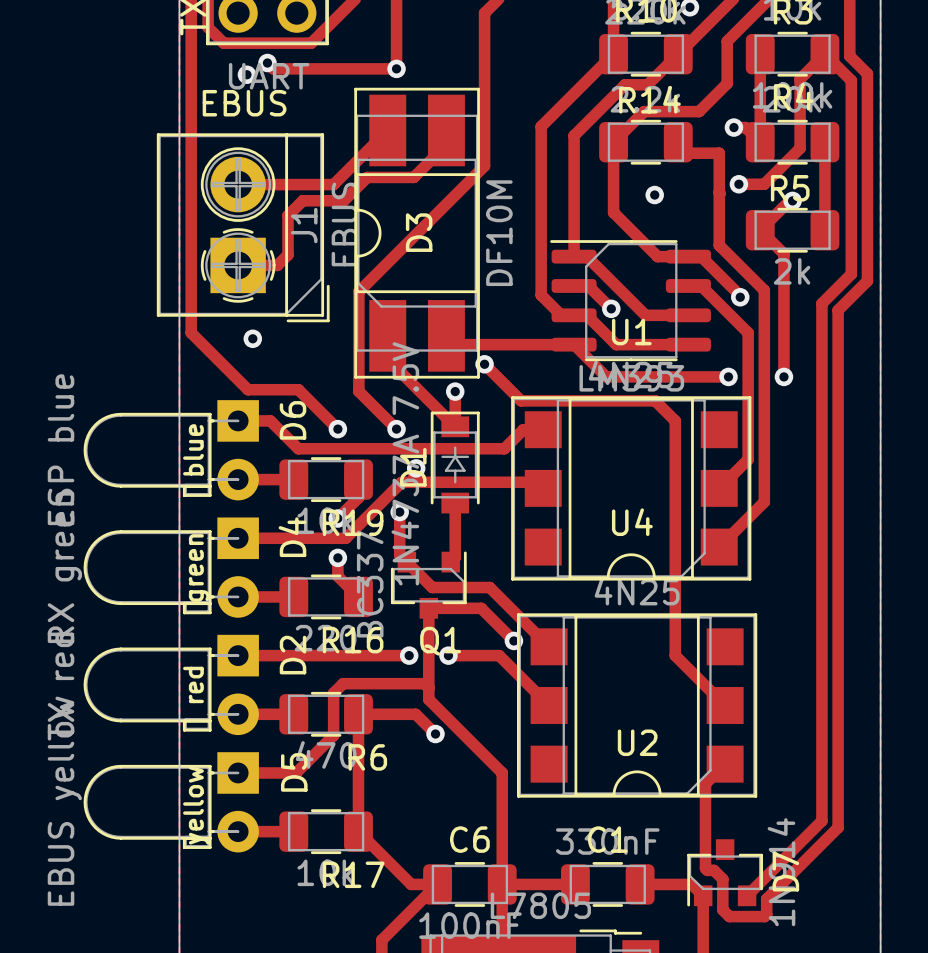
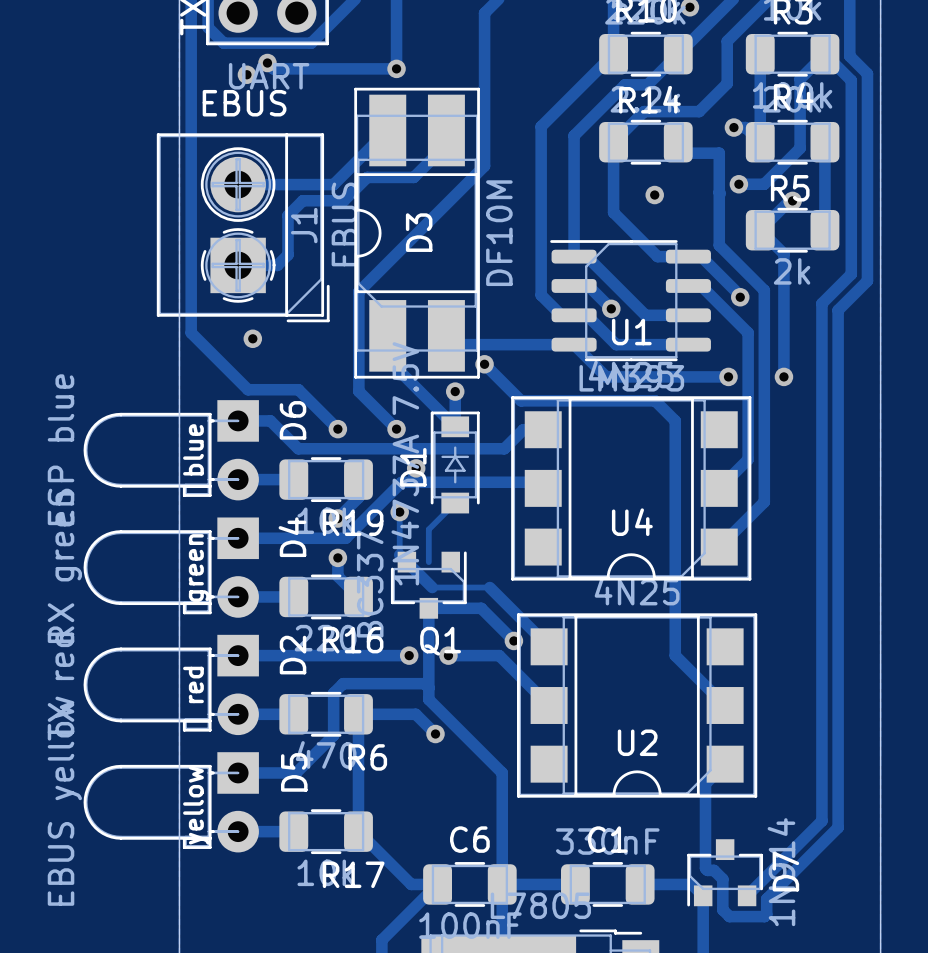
track: (455, 503) (455, 557) (450, 562) -> (455, 503) (428, 529) (428, 562)
track width: thick (399, 512) (399, 554) -> thin (399, 512) (399, 554)
track width: thick (432, 587) (489, 587) -> thin (432, 587) (489, 587)

